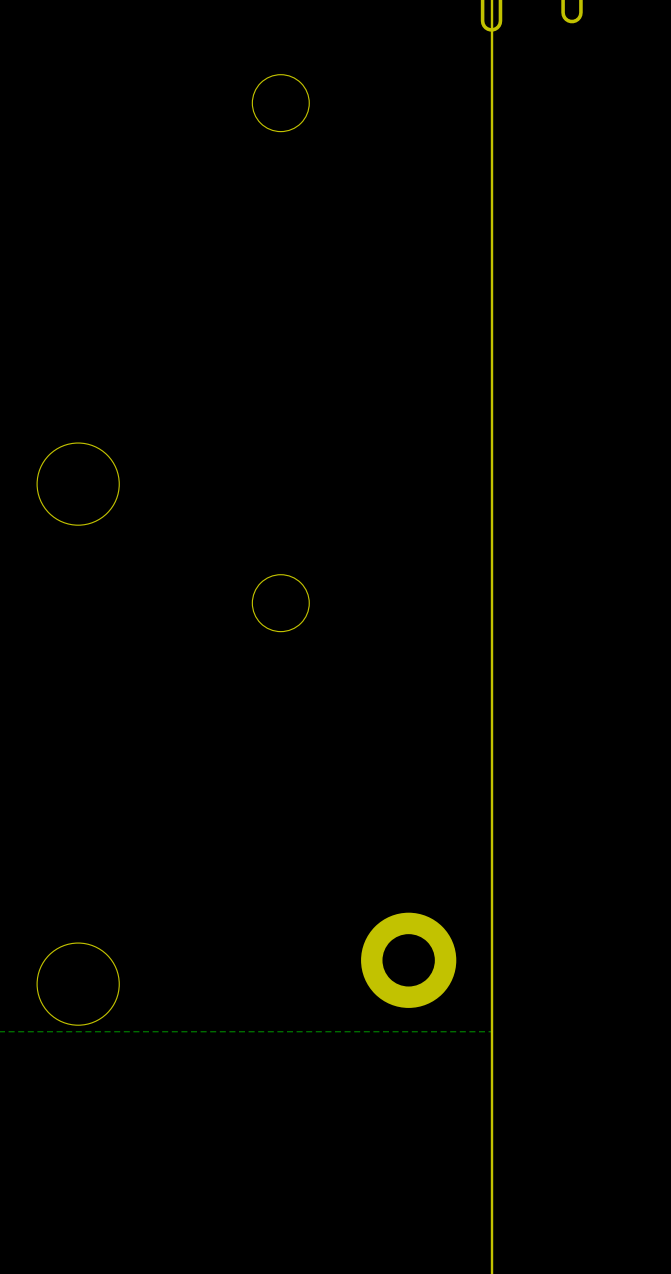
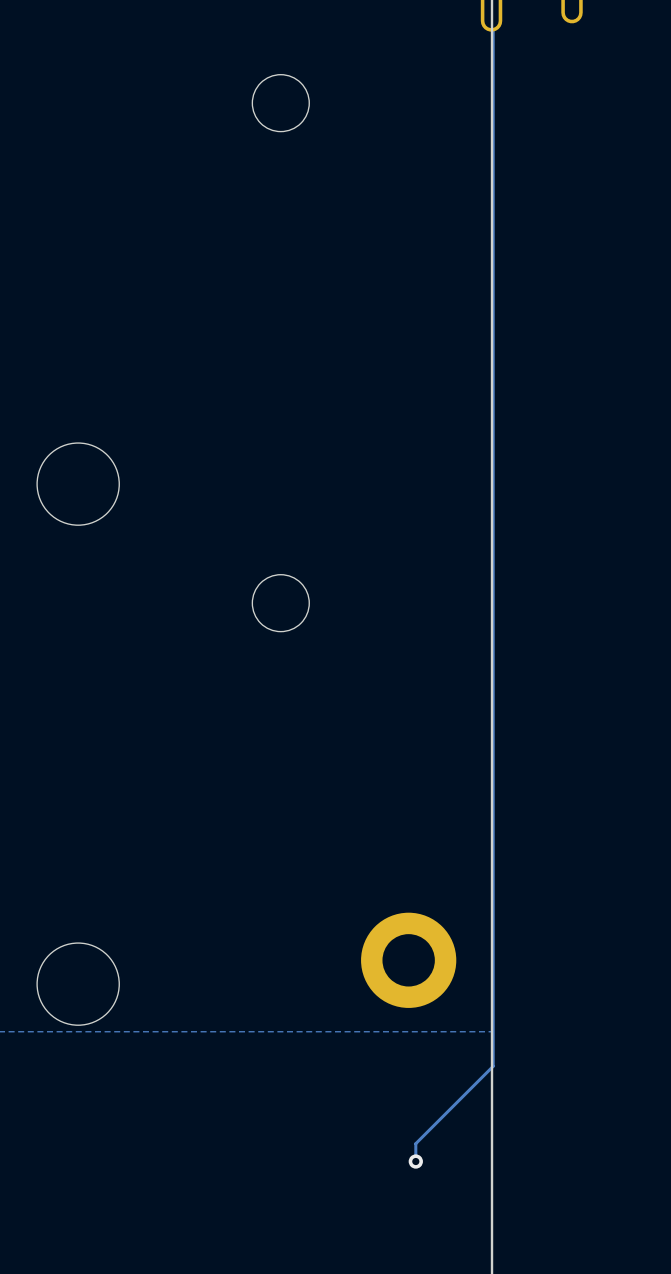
track: none -> (493, 18) (493, 1066) (415, 1143) (415, 1161)
via: none -> (415, 1161)

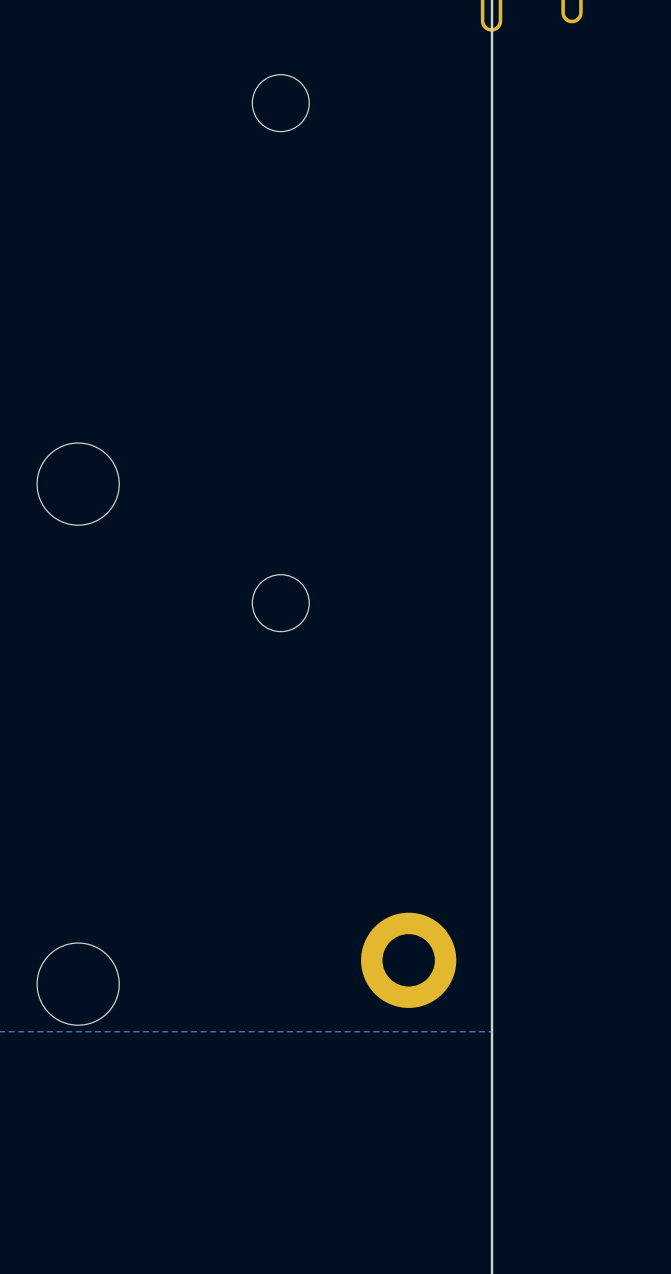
track: (493, 18) (493, 1066) (415, 1143) (415, 1161) -> none
via: (415, 1161) -> none

